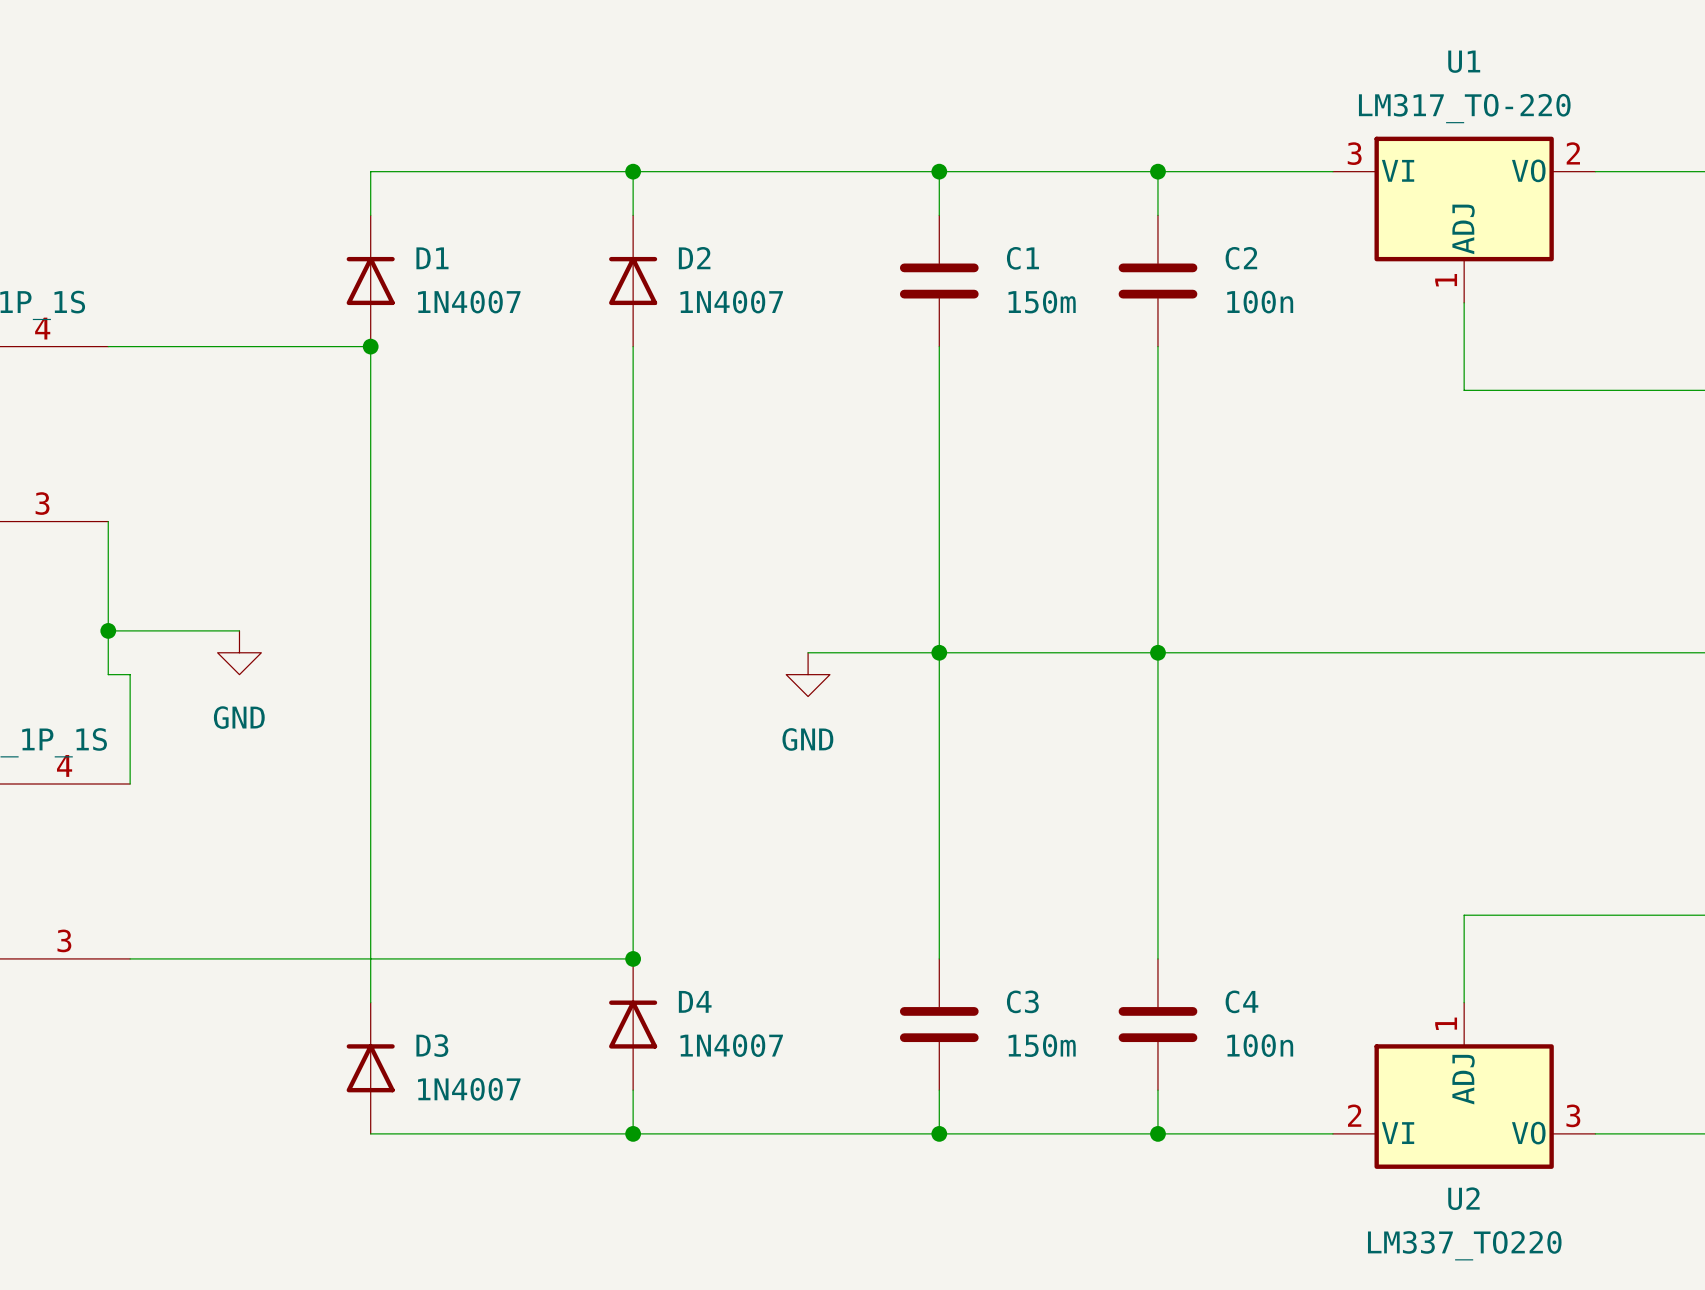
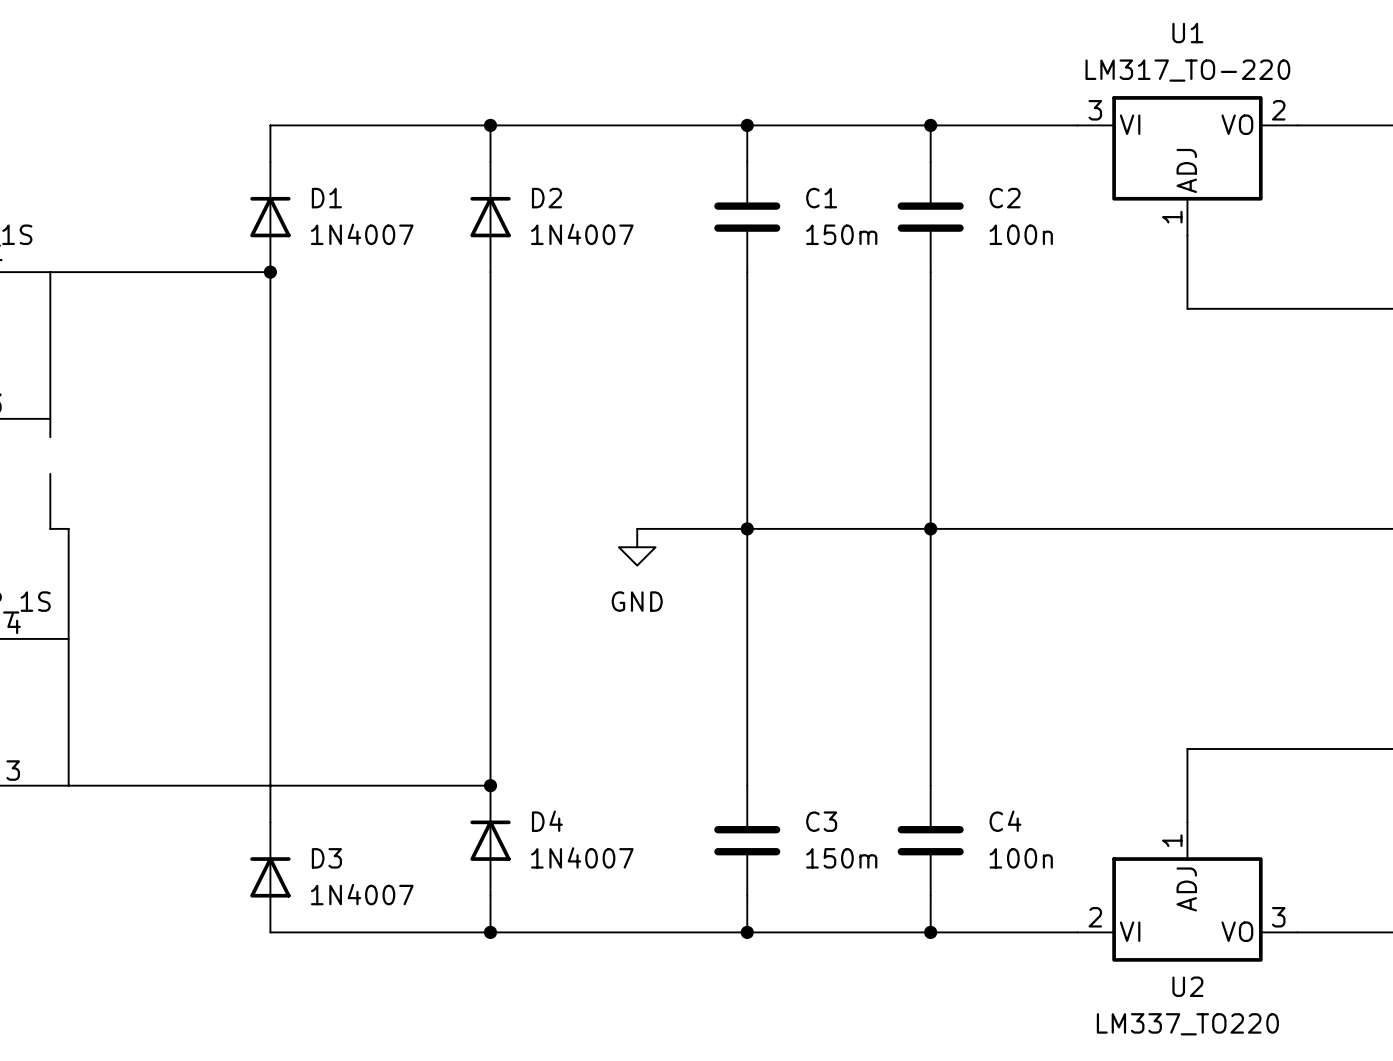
wire: none -> (50, 272) (50, 418)
wire: (108, 543) (108, 587) -> none
wire: (108, 630) (239, 630) -> none
junction: (108, 630) -> none
wire: (108, 652) (108, 674) (130, 674) -> (50, 528) (68, 528) (68, 547)
power symbol: GND (239, 652) -> none
wire: none -> (68, 638) (68, 785)

